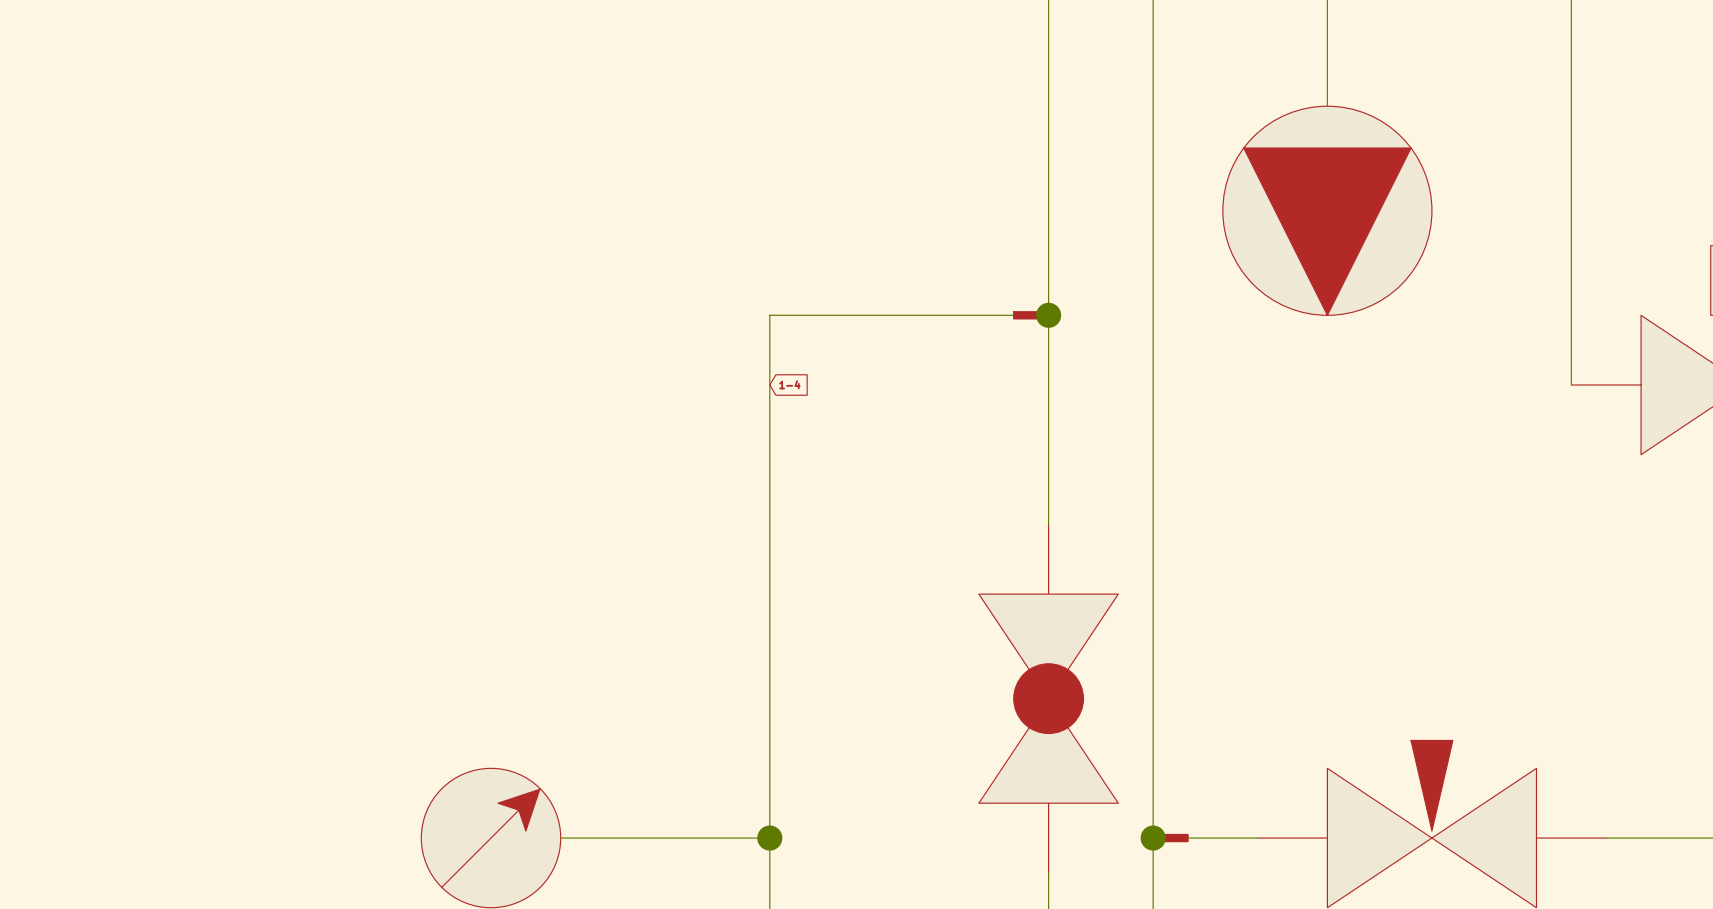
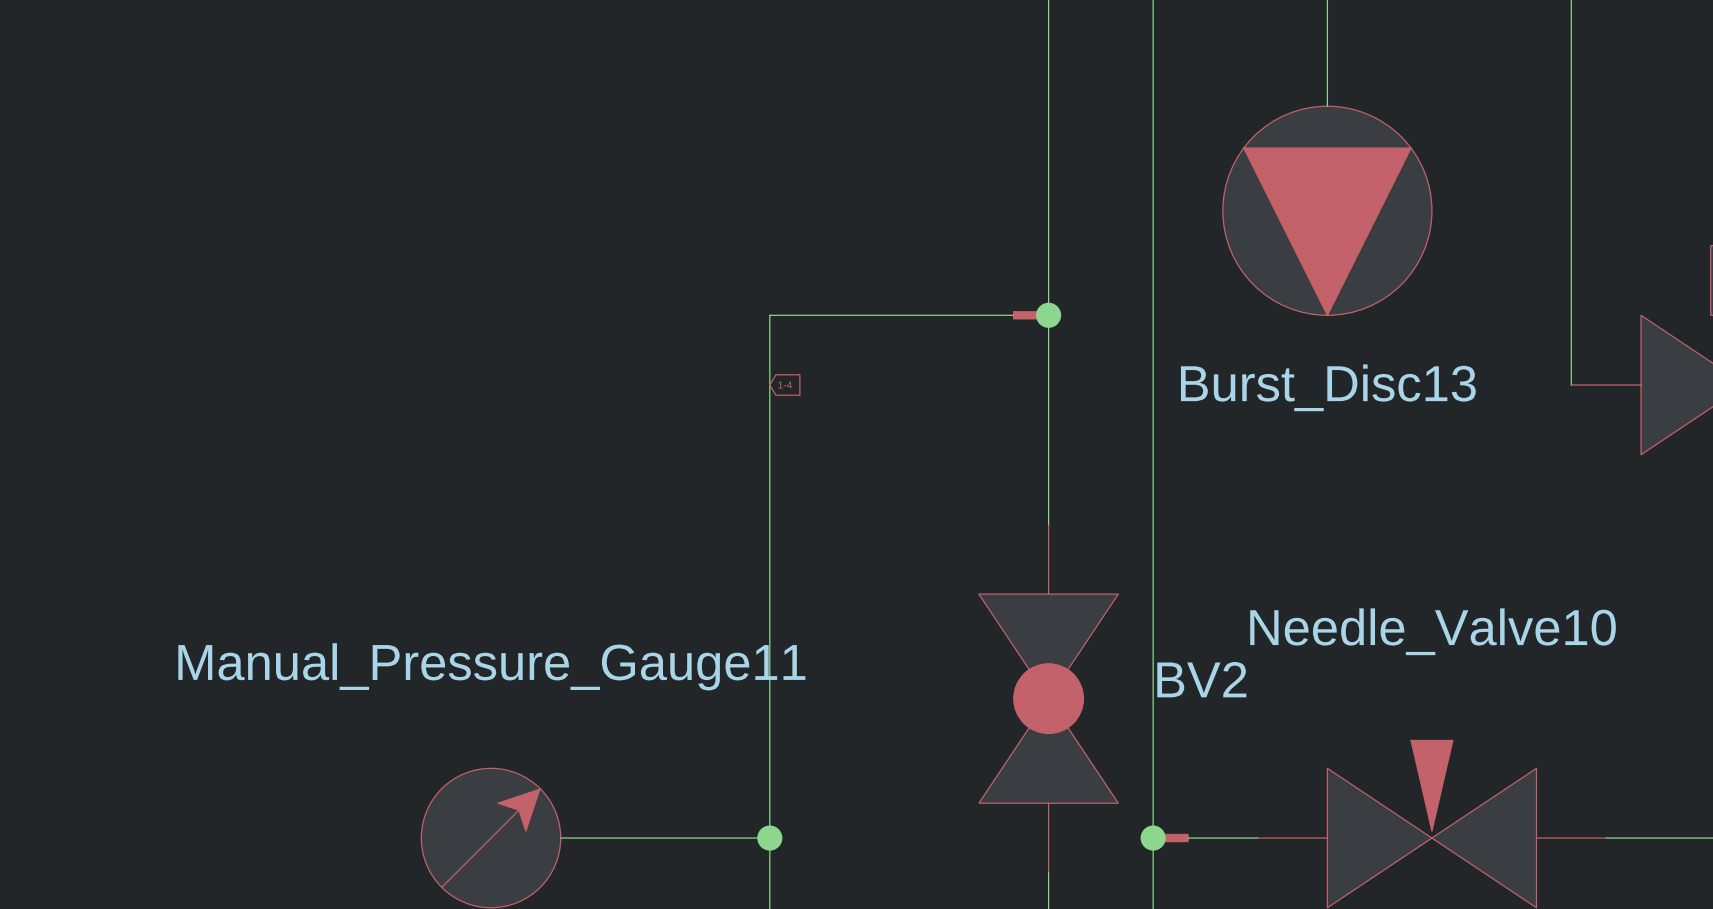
Burst_Disc13 name: none -> Burst_Disc13 (1328, 387)
Needle_Valve10 name: none -> Needle_Valve10 (1433, 631)
Manual_Pressure_Gauge11 name: none -> Manual_Pressure_Gauge11 (491, 666)
BV2 name: none -> BV2 (1201, 679)

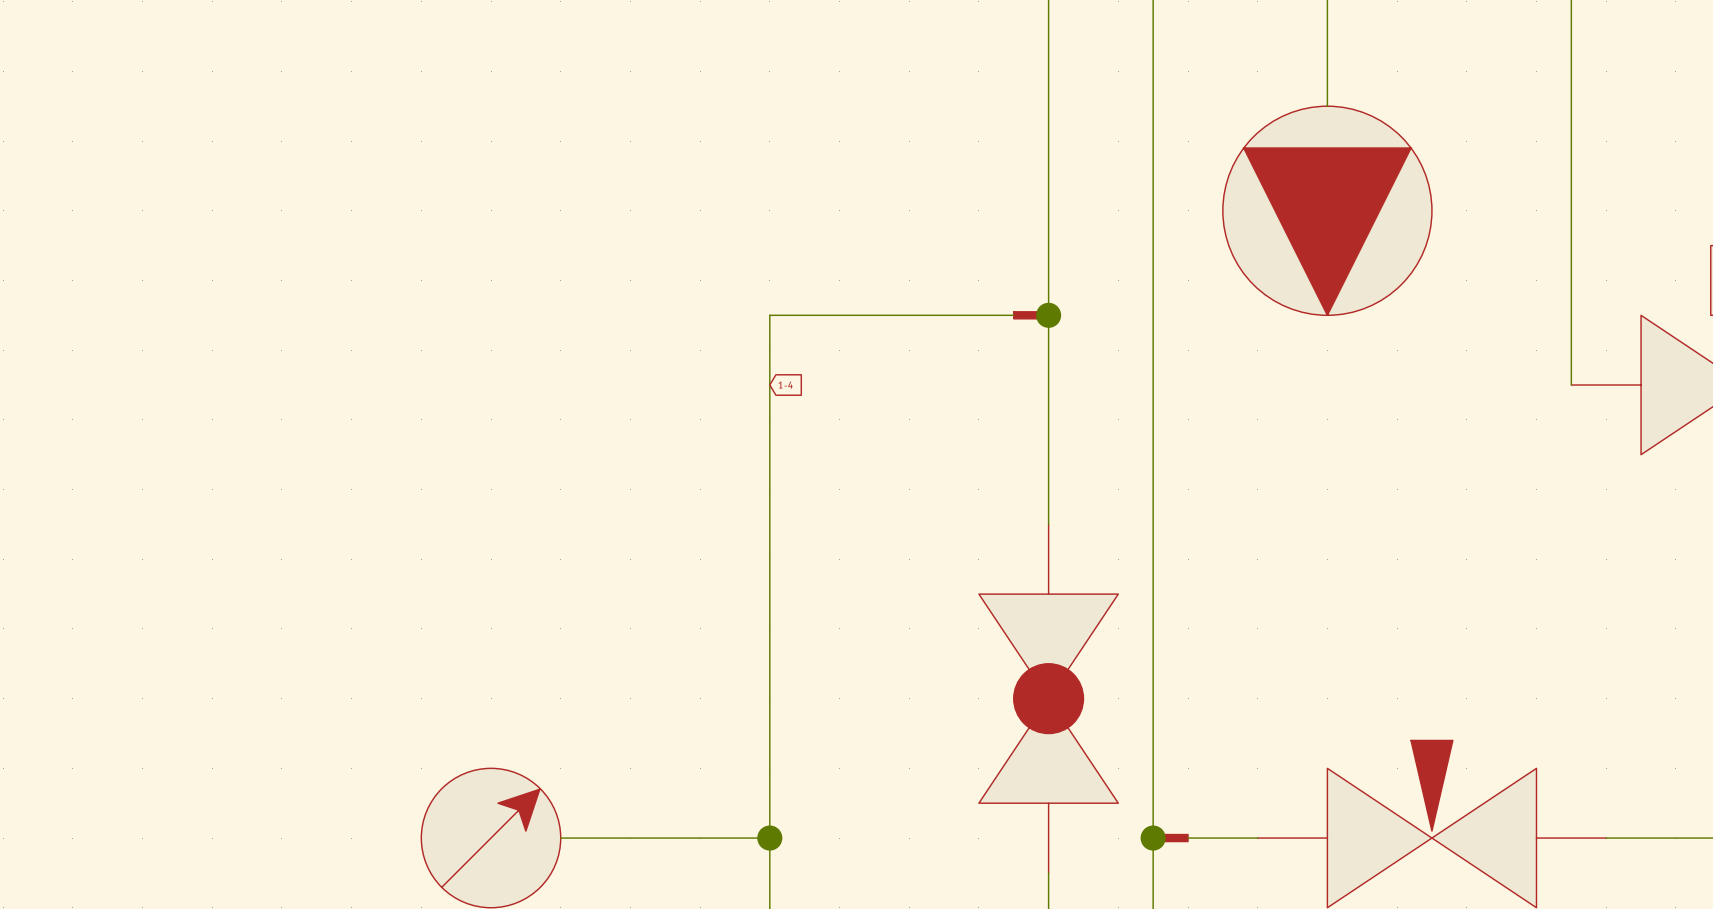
Burst_Disc13 name: Burst_Disc13 (1328, 387) -> none
Needle_Valve10 name: Needle_Valve10 (1433, 631) -> none
Manual_Pressure_Gauge11 name: Manual_Pressure_Gauge11 (491, 666) -> none
BV2 name: BV2 (1201, 679) -> none

